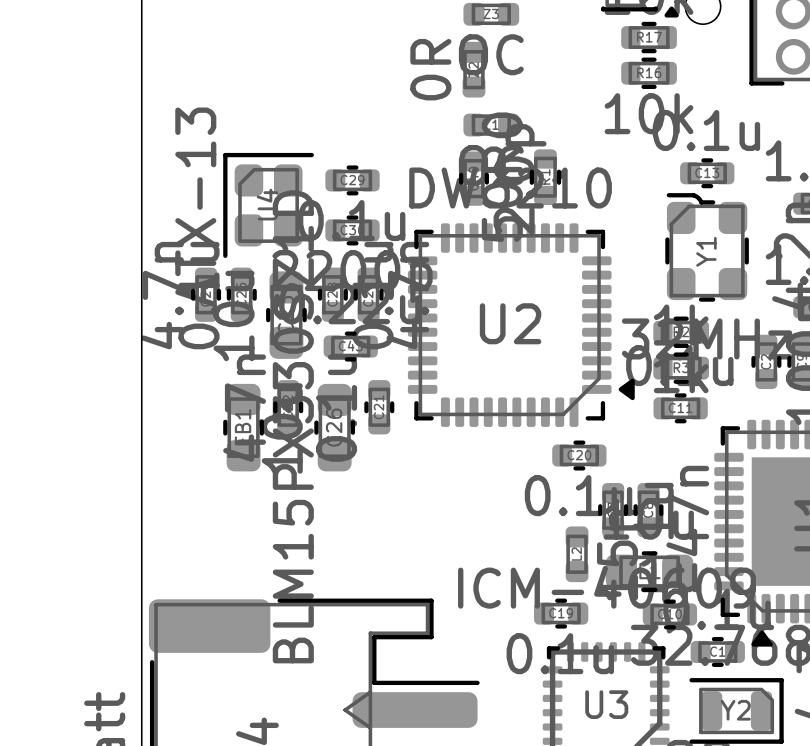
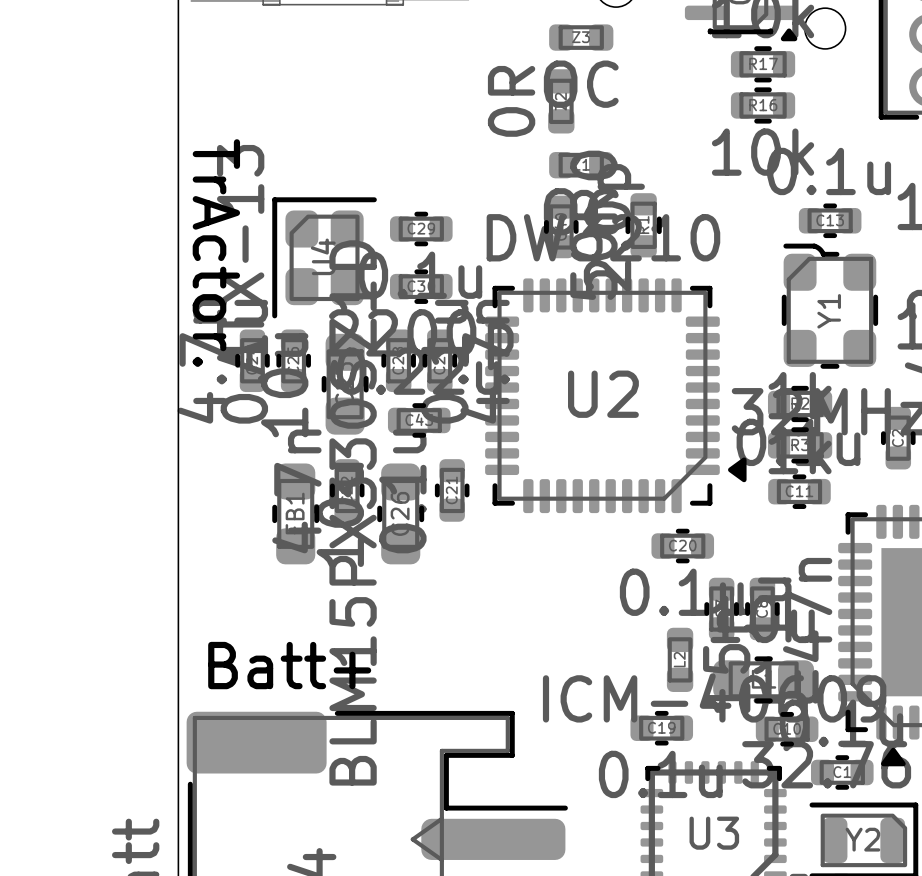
text: none -> TrActor. (216, 253)
text: none -> Batt+ (289, 665)

